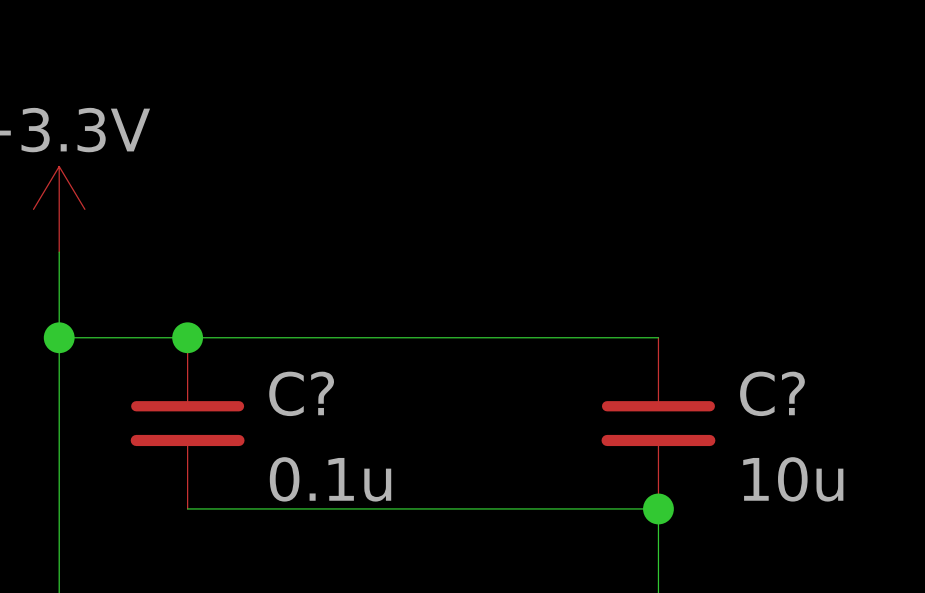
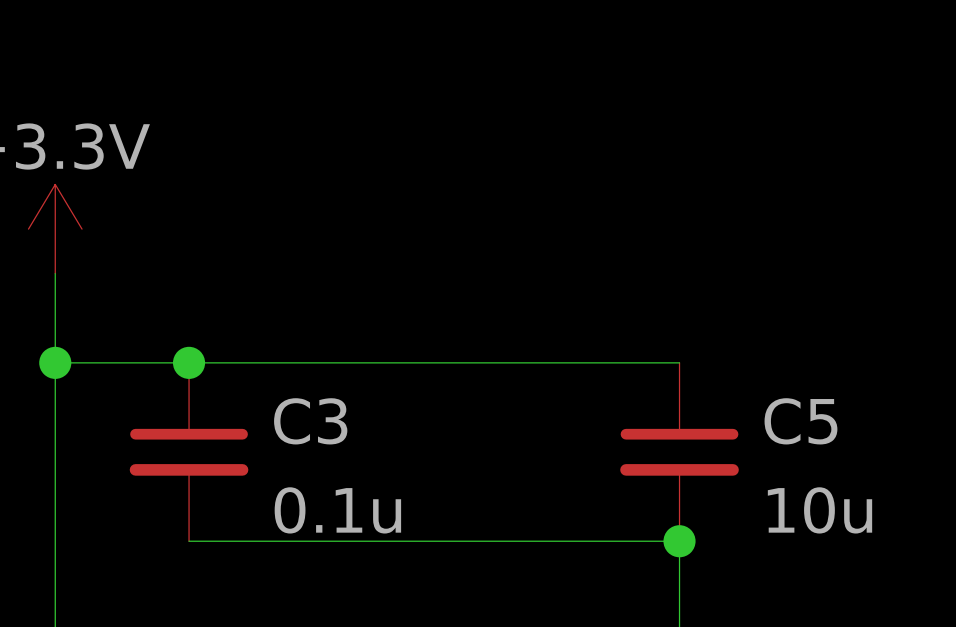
C? name: C? (301, 393) -> C3 (310, 421)
C? name: C? (772, 393) -> C5 (800, 421)

